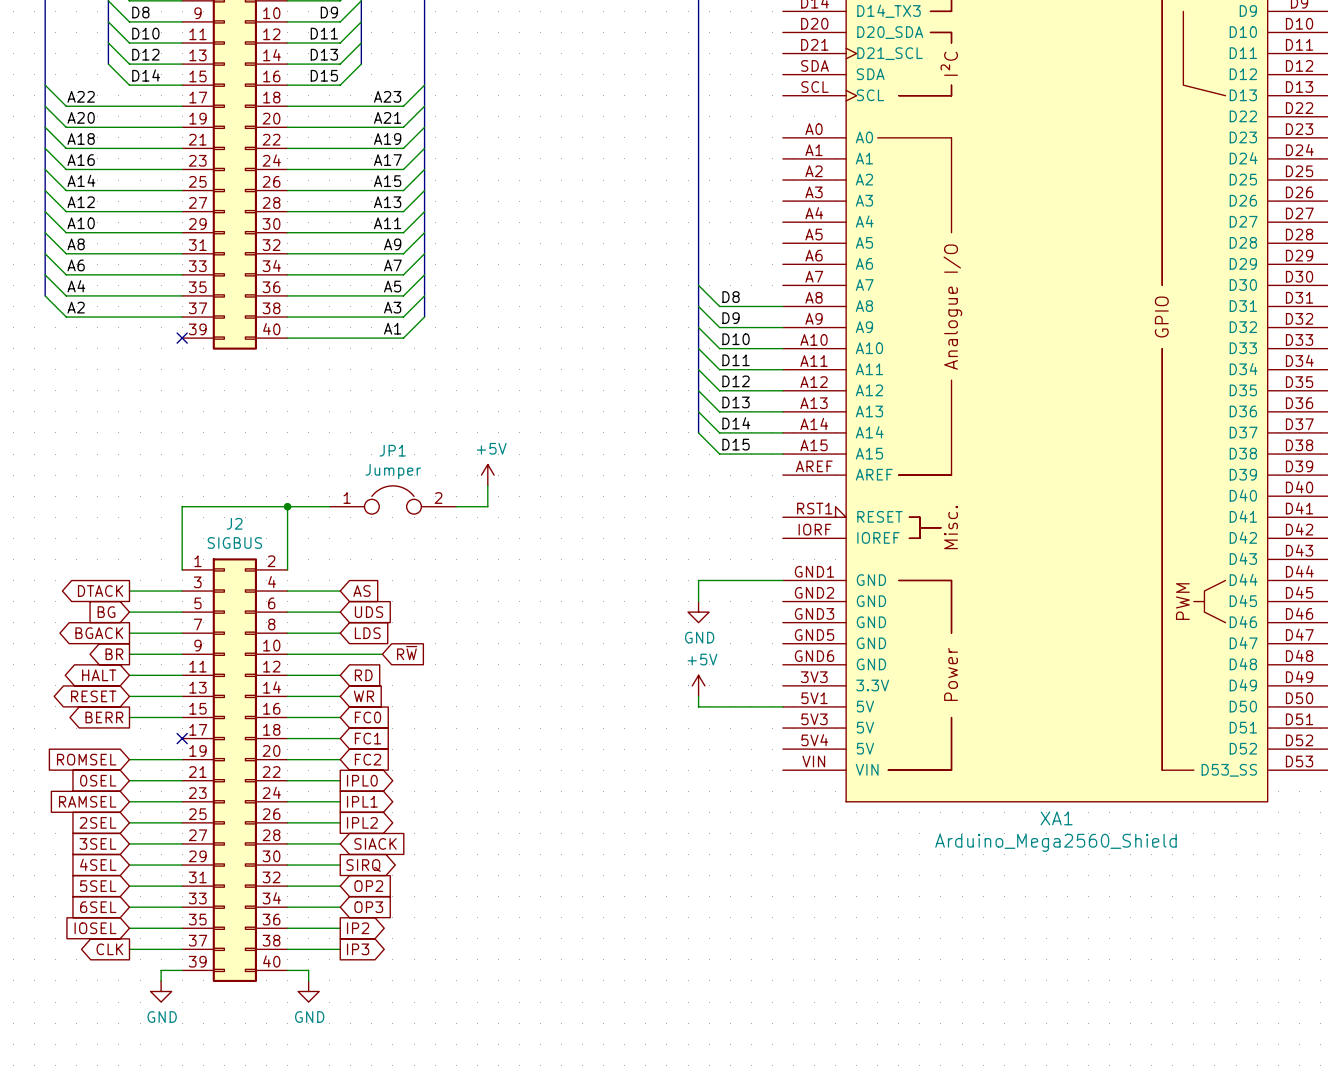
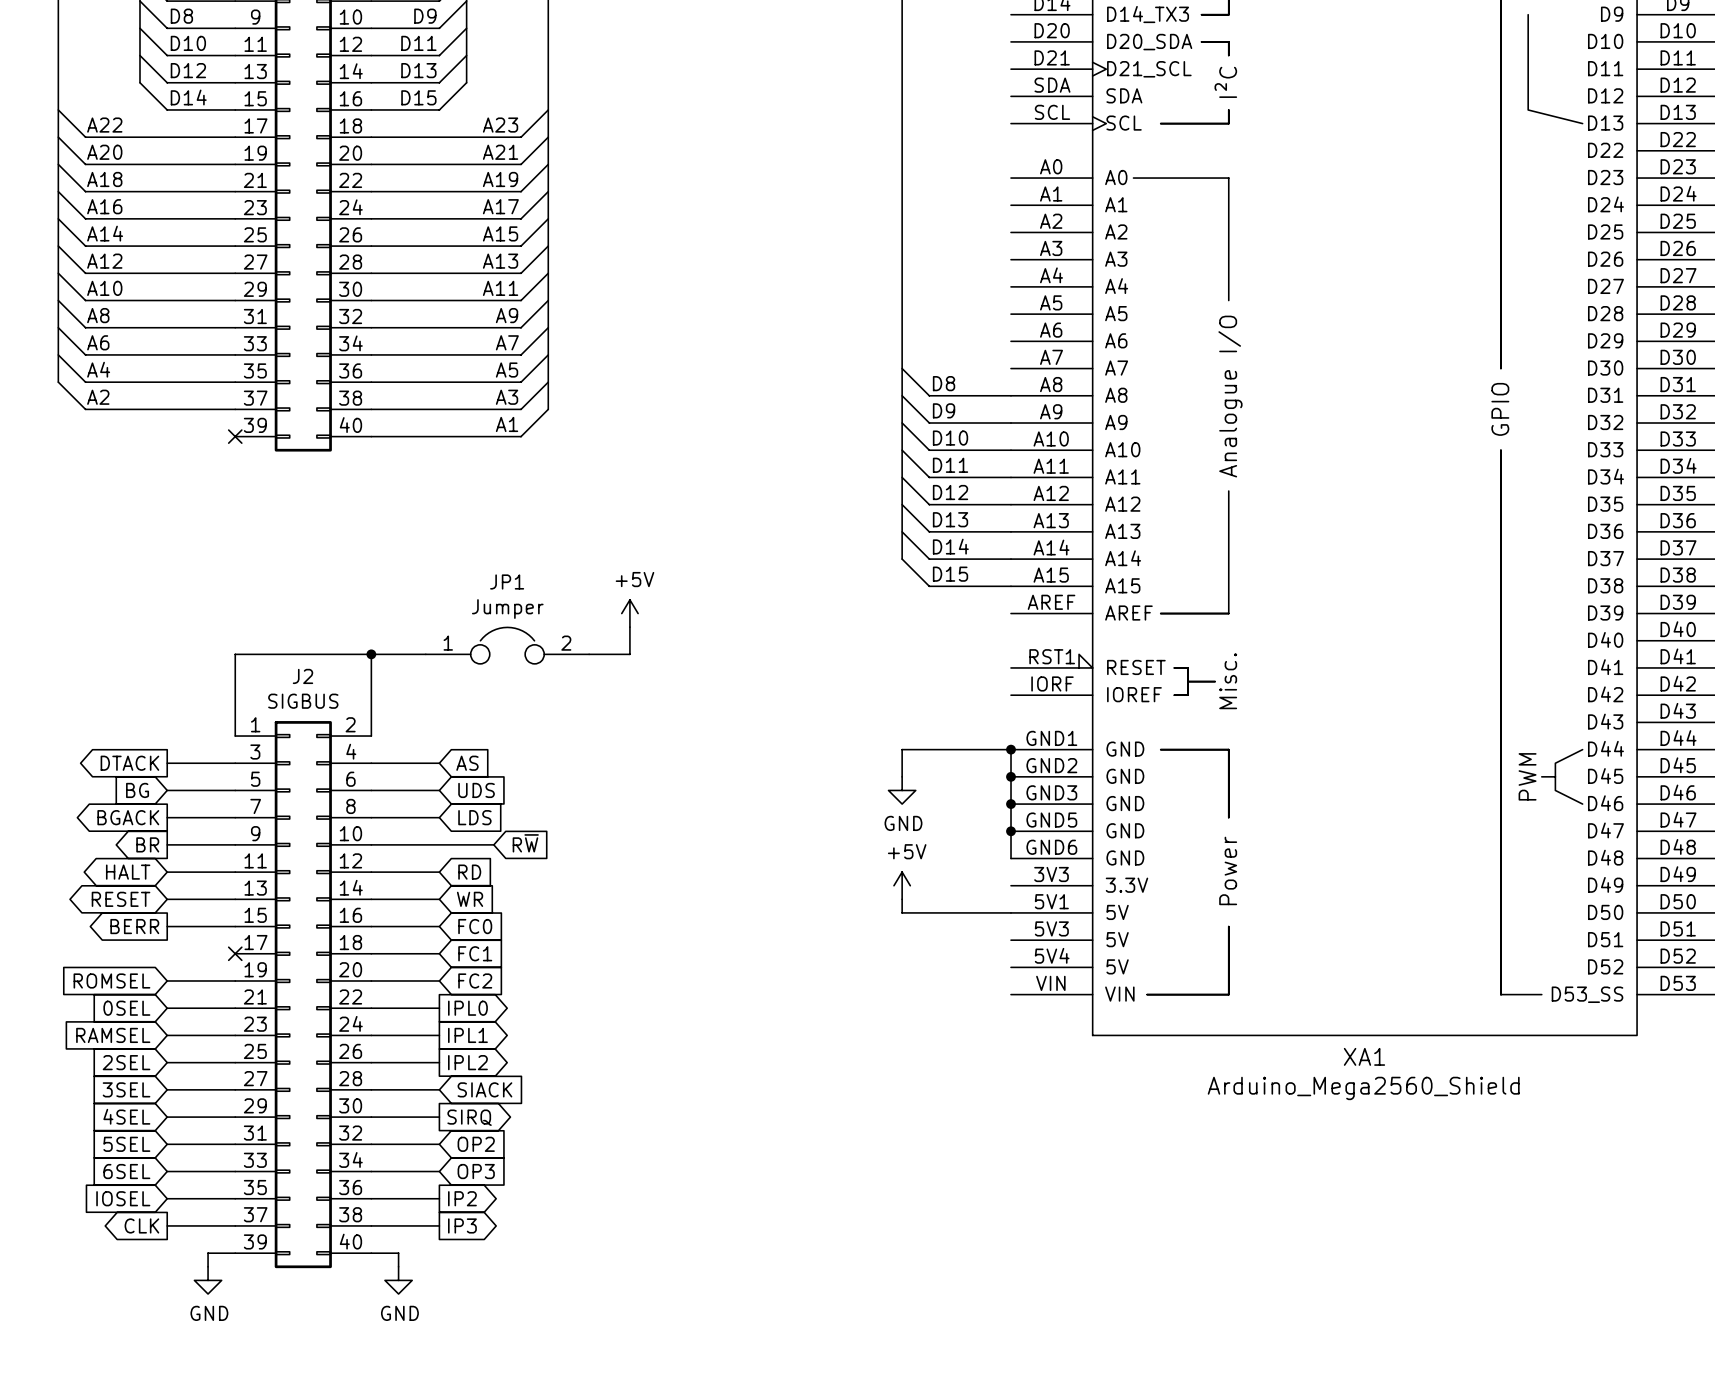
wire: none -> (1011, 749) (1011, 858)
junction: none -> (1011, 749)
junction: none -> (1011, 776)
junction: none -> (1011, 804)
junction: none -> (1011, 831)

